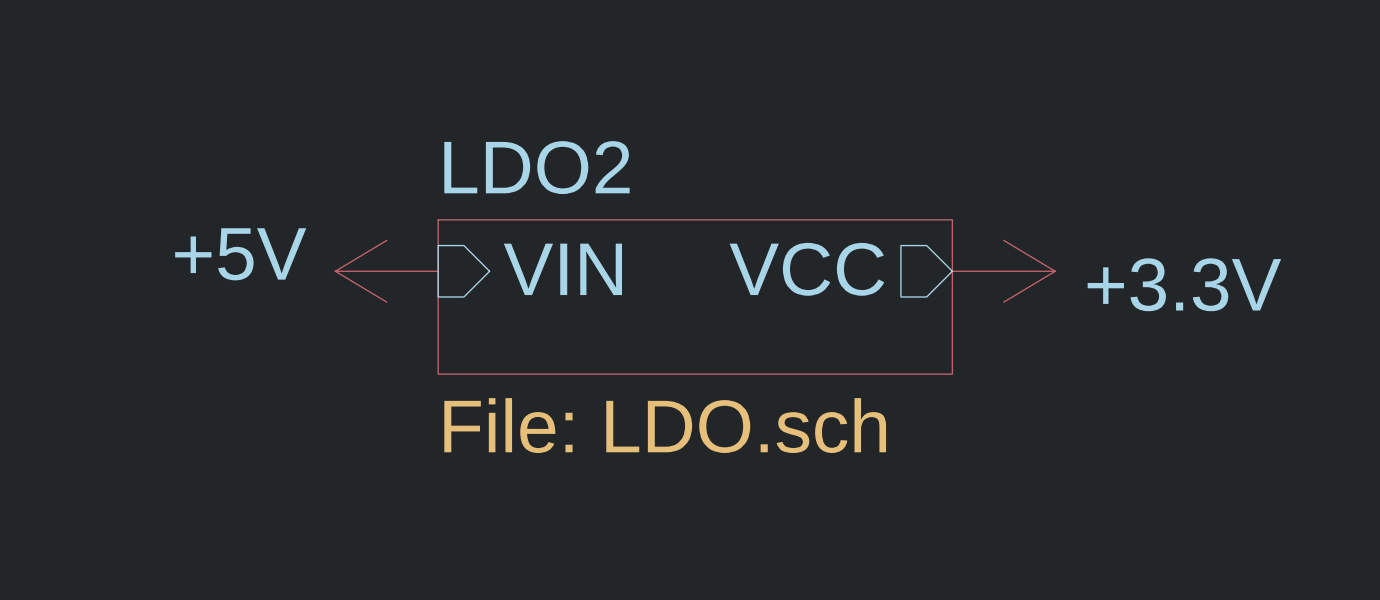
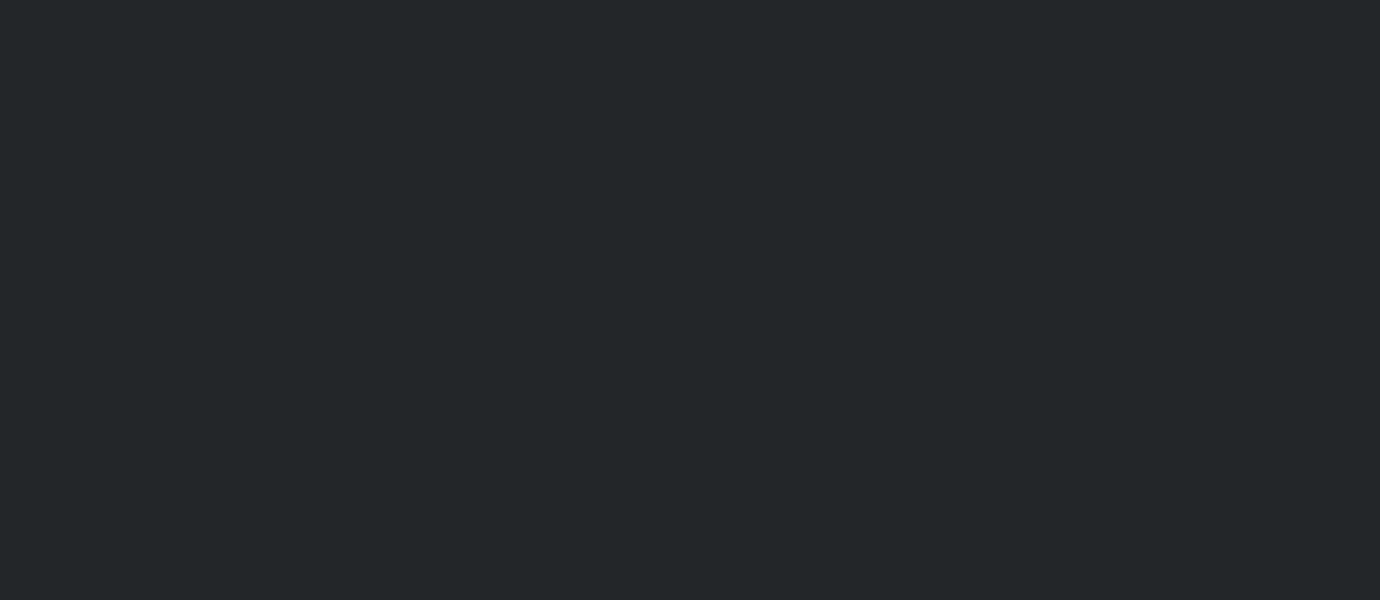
sheet pin: VIN (562, 269) -> none
sheet pin: VCC (806, 269) -> none
power symbol: +5V (386, 271) -> none
power symbol: +3.3V (1003, 271) -> none
sheet LDO2: File: LDO.sch (695, 296) -> none

